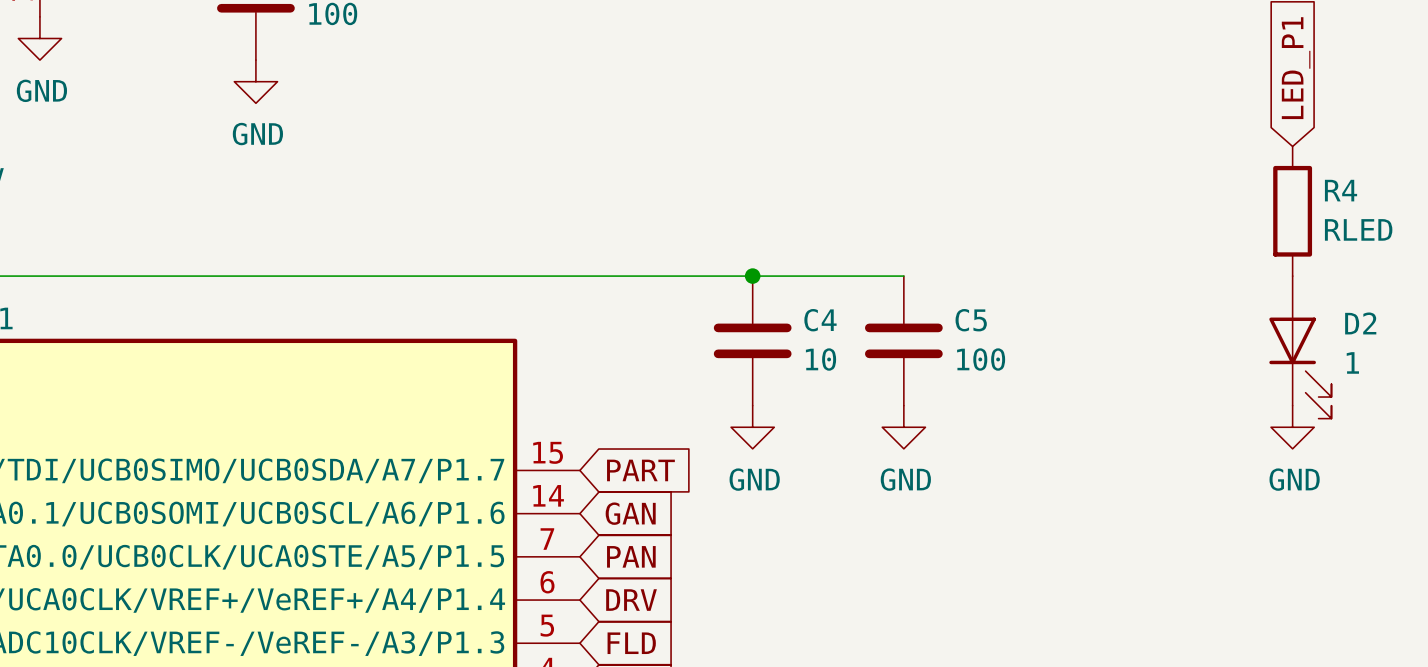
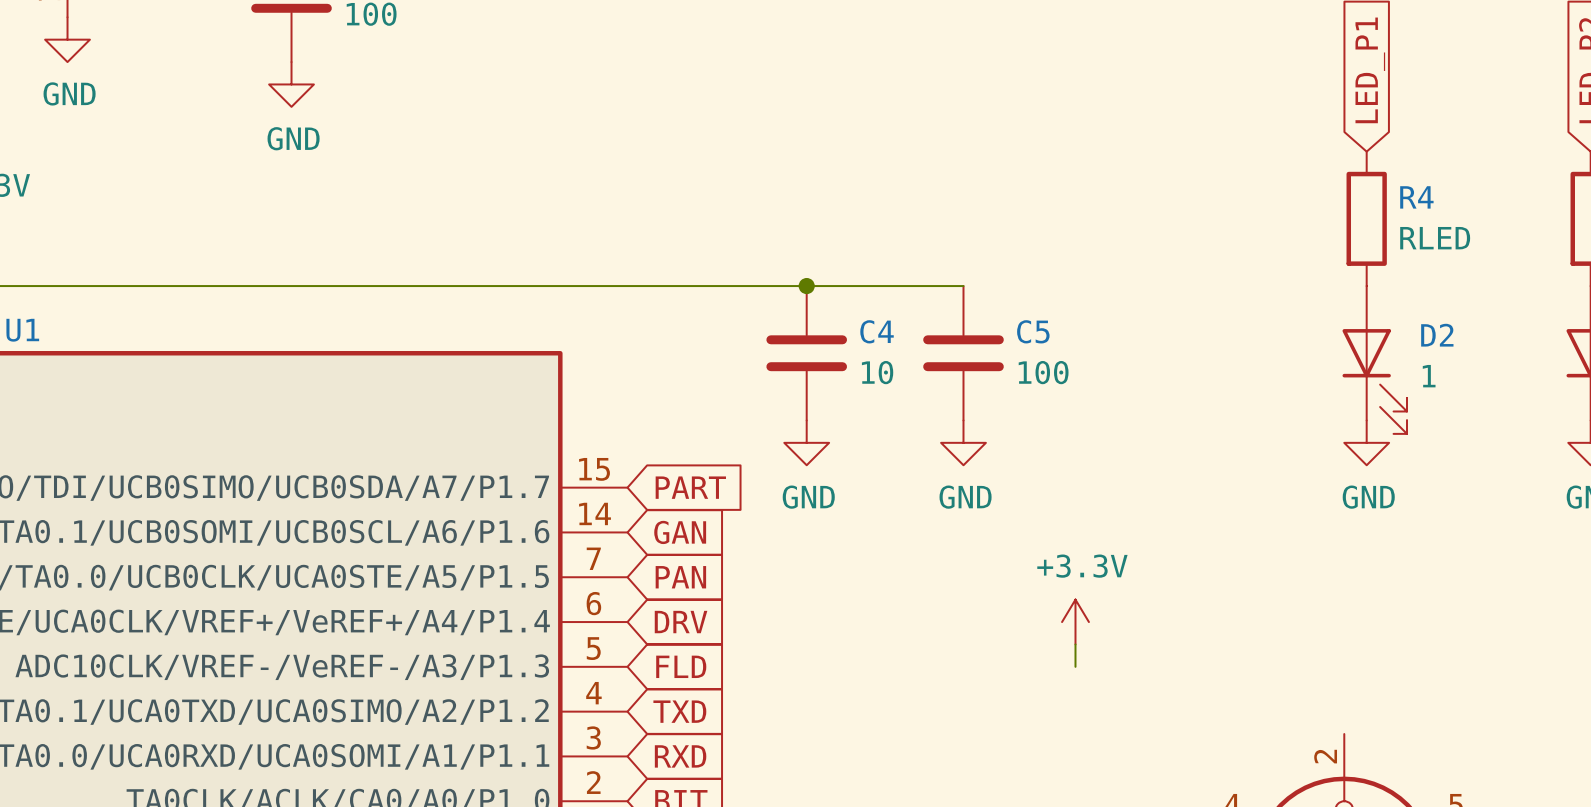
power symbol: none -> +3.3V (1075, 622)
wire: none -> (1075, 644) (1075, 666)

